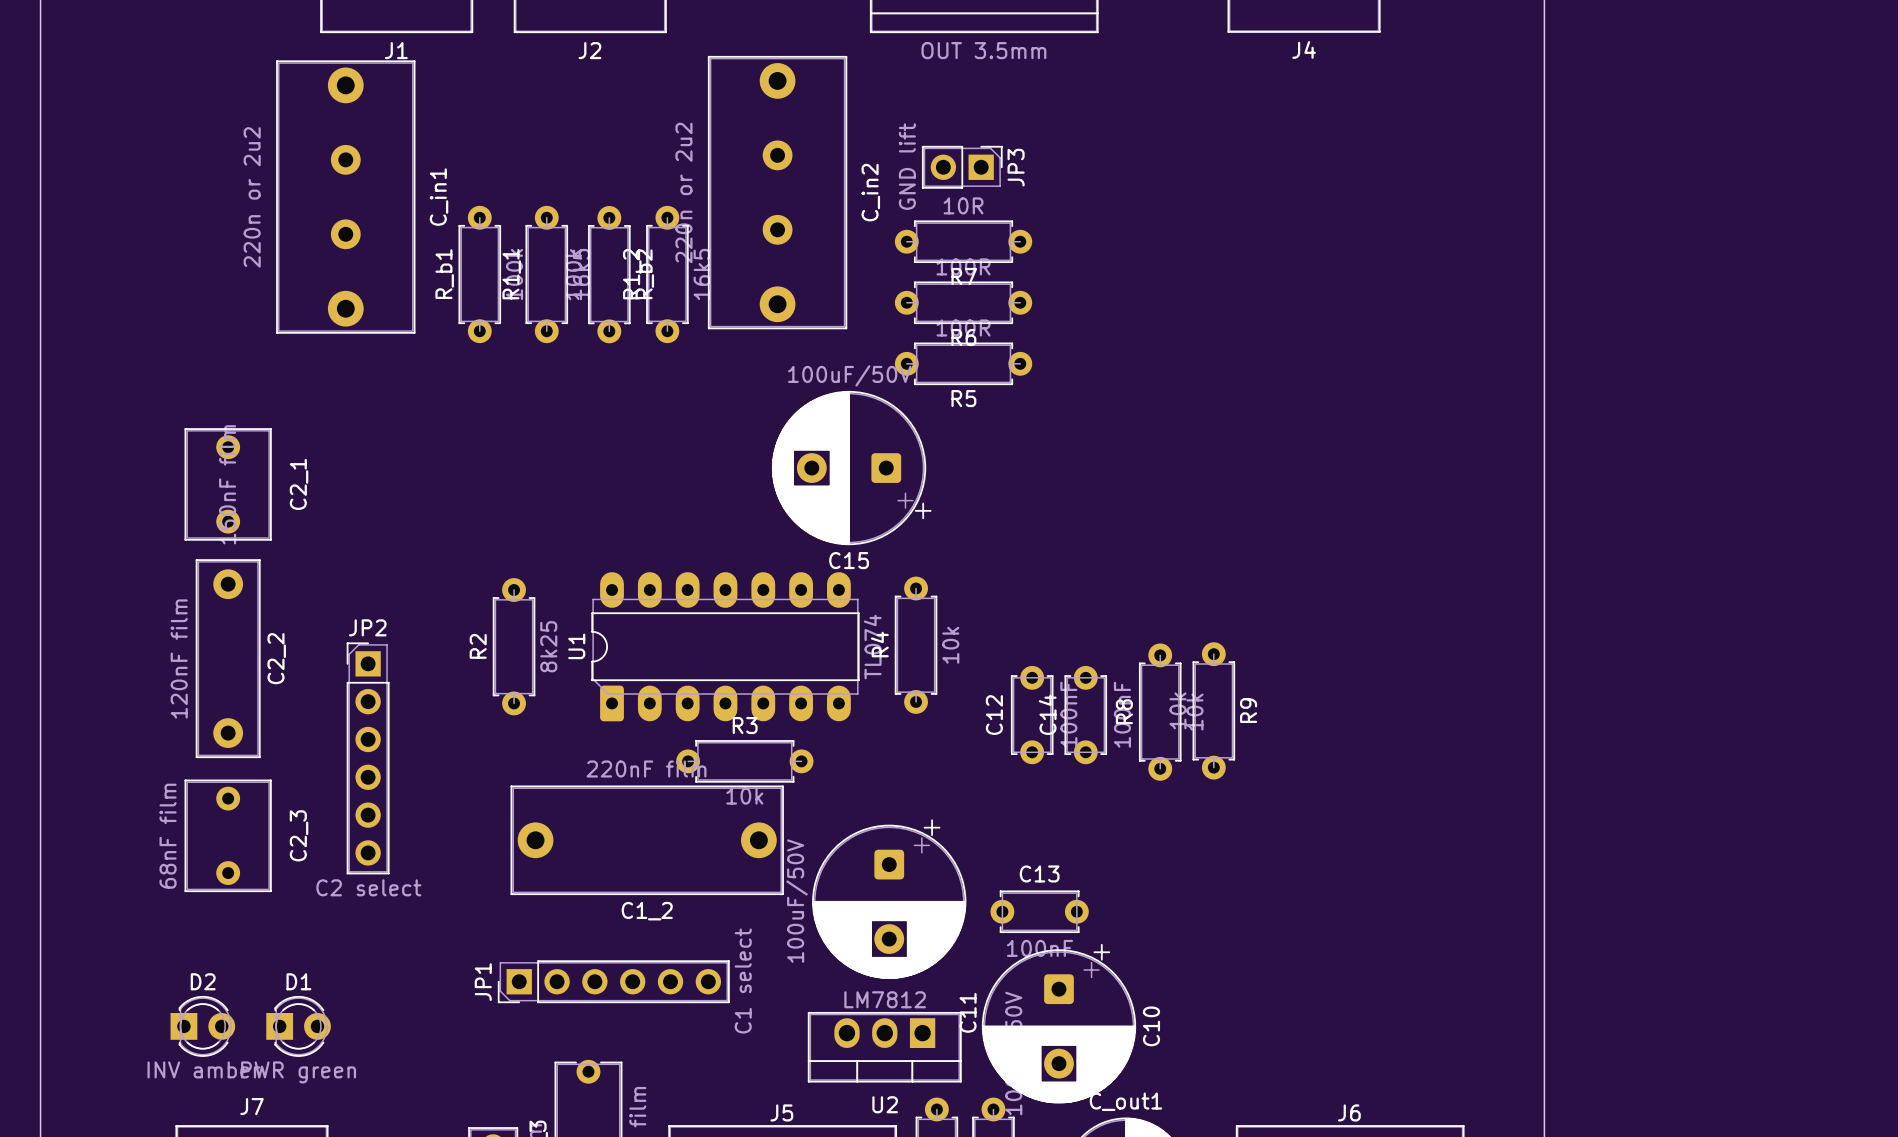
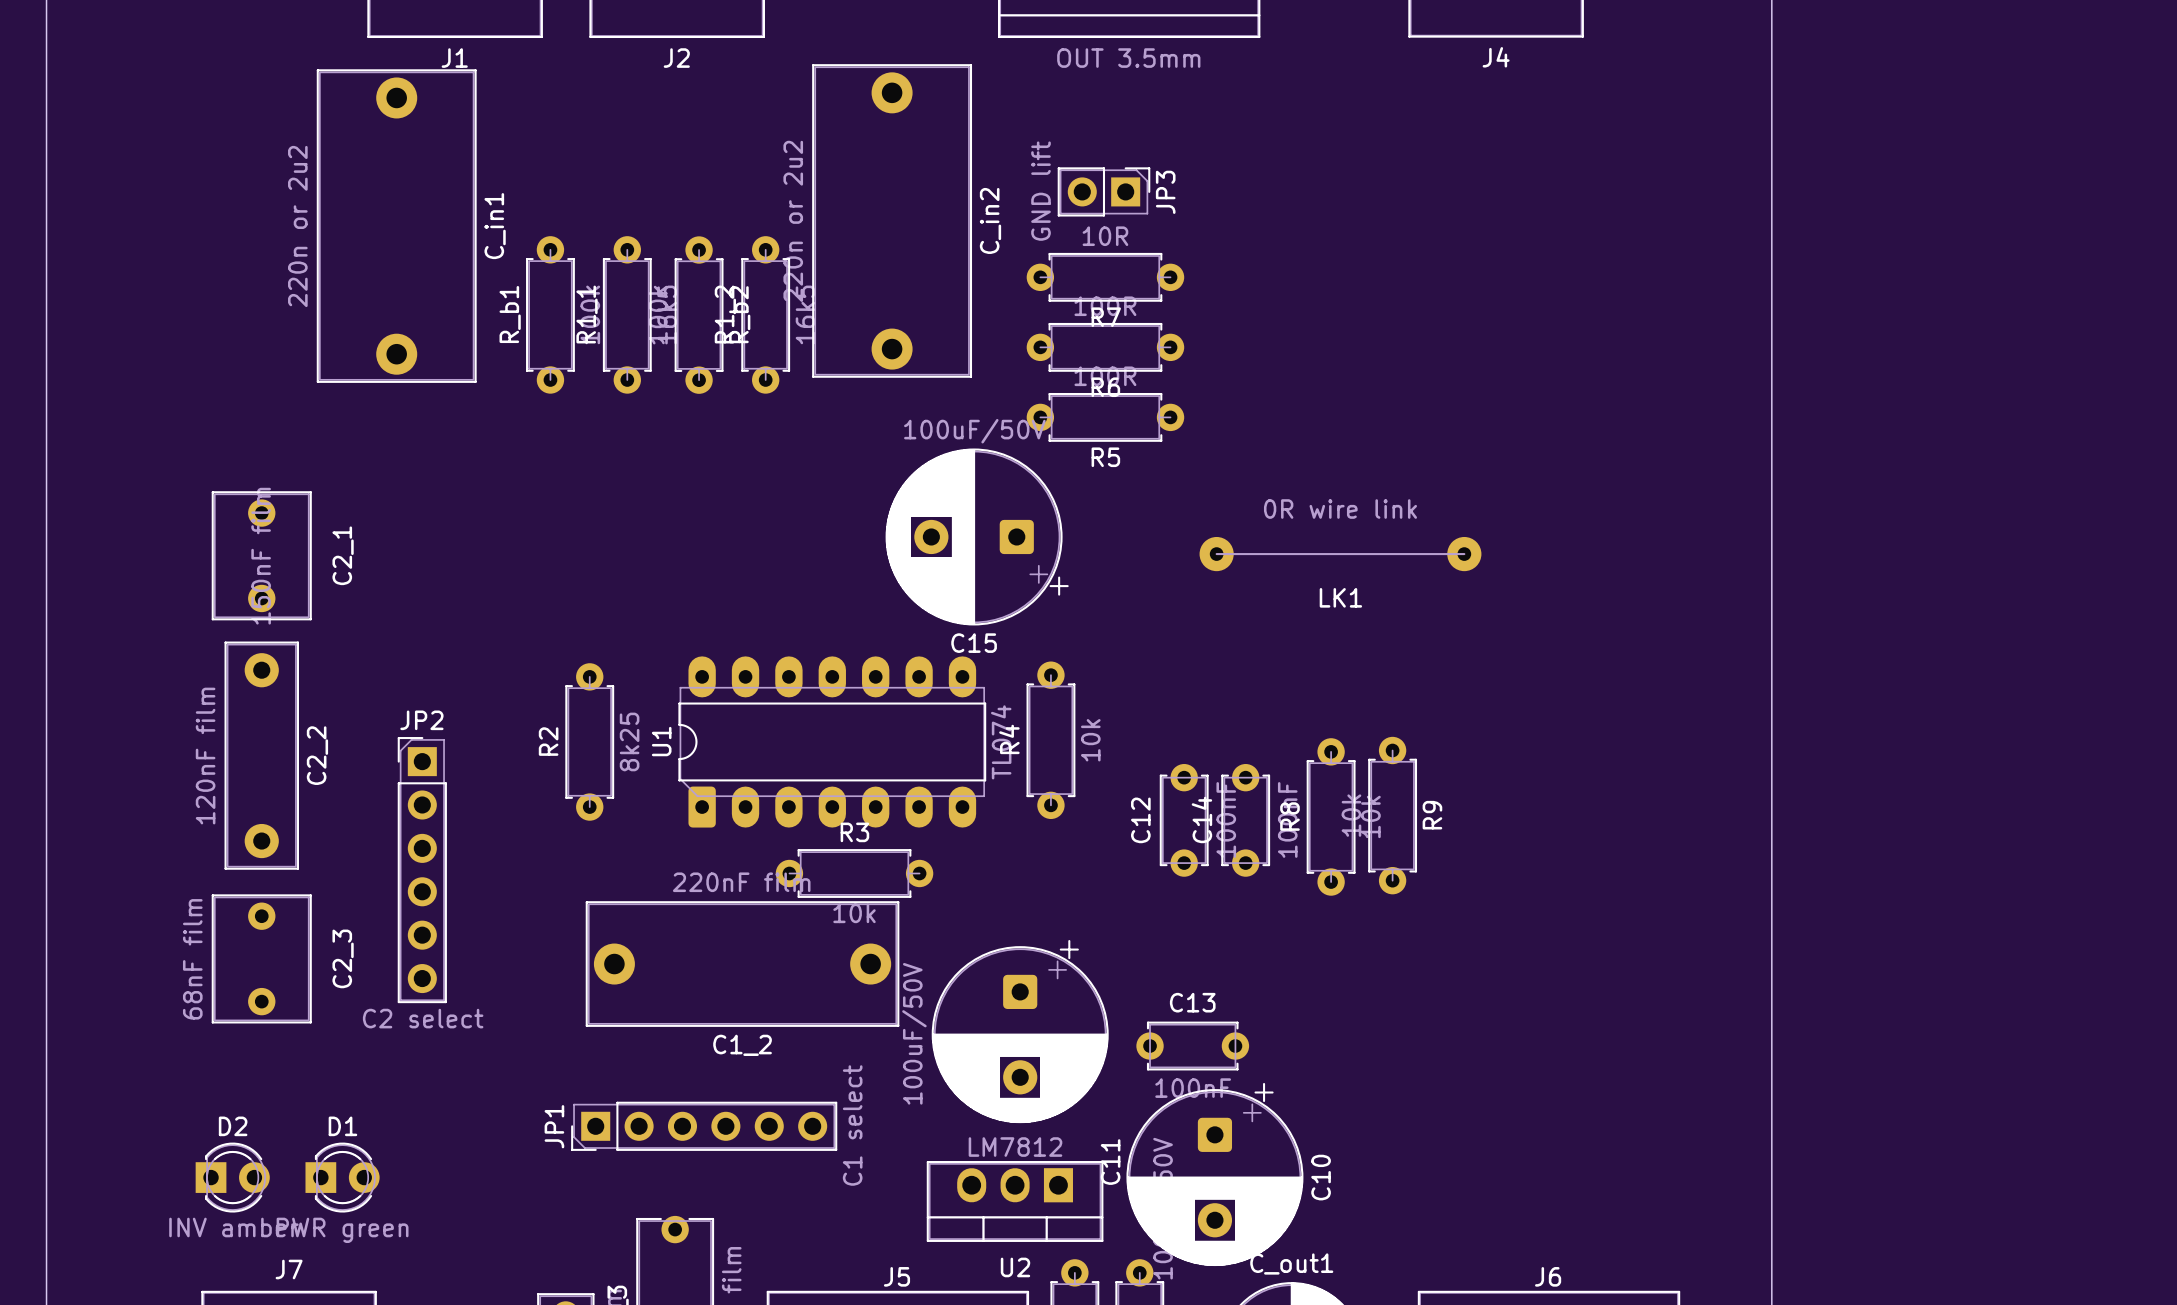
C_in2 footprint: [707, 55, 848, 330] -> [812, 64, 973, 378]
C_in1 footprint: [276, 60, 416, 334] -> [316, 69, 477, 383]
LK1: none -> 0R wire link (1340, 554)

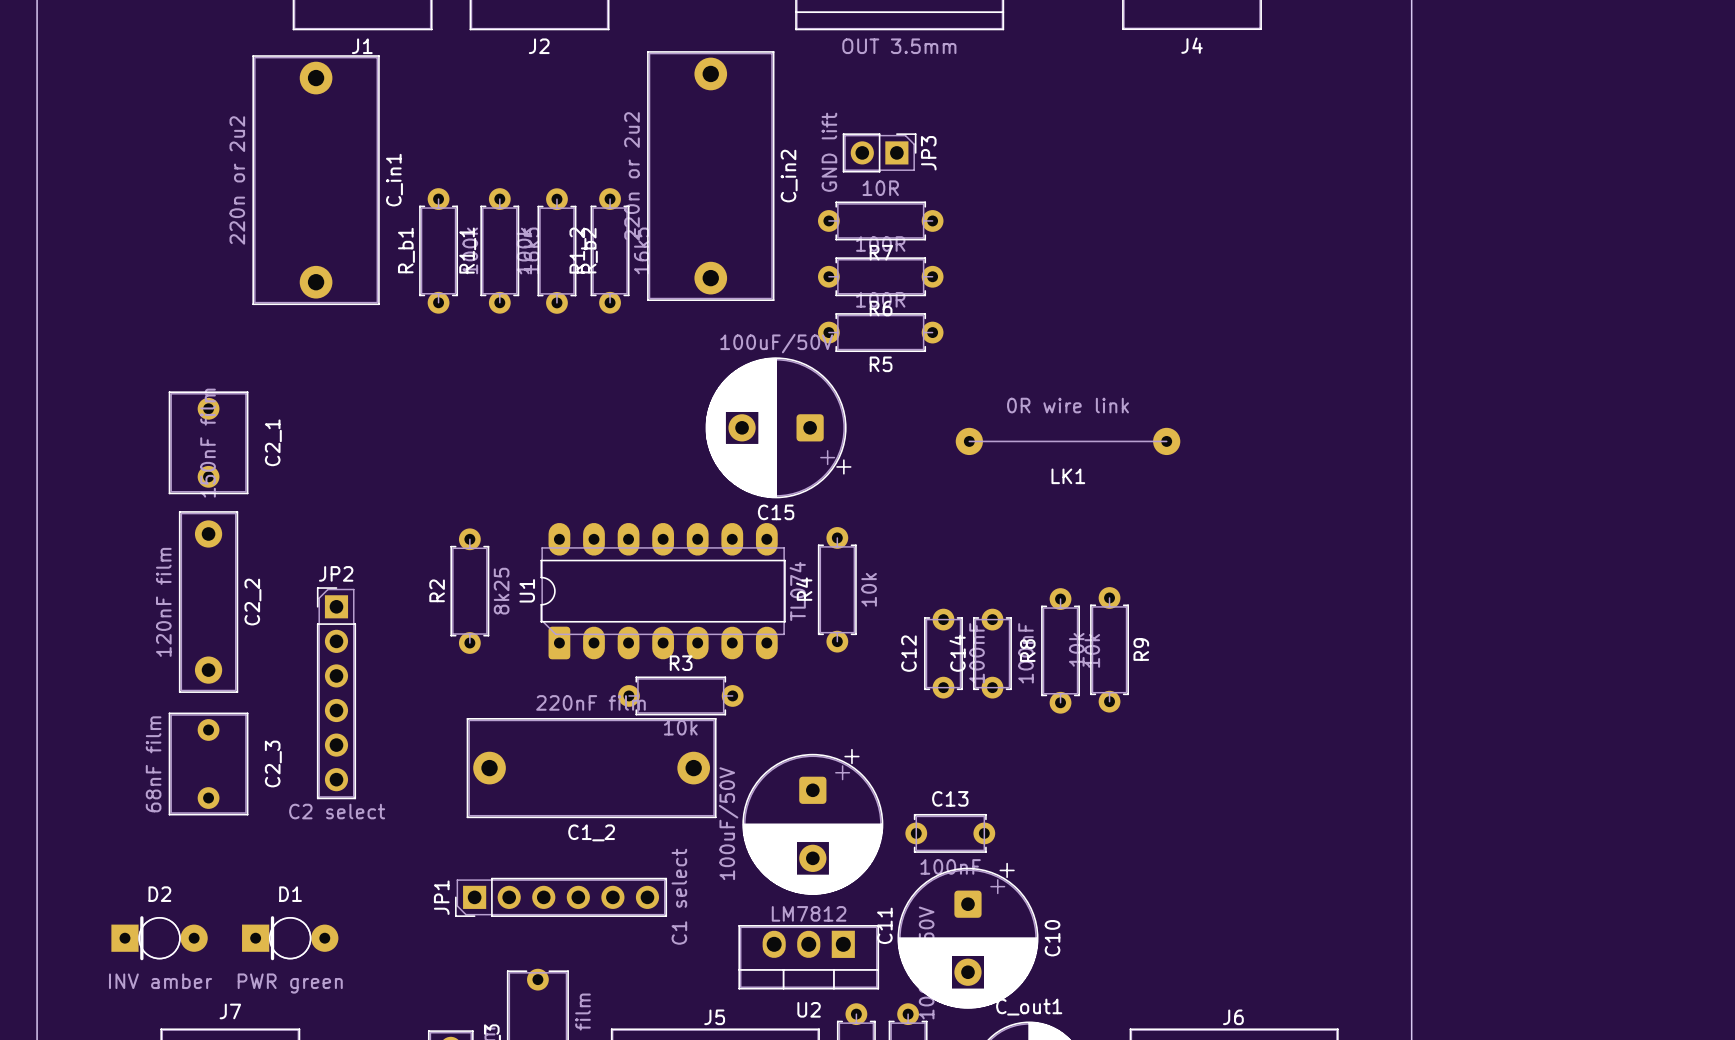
D2 footprint: [195, 1142, 270, 1213] -> [111, 916, 208, 961]
D1 footprint: [305, 1142, 380, 1213] -> [242, 916, 339, 961]

